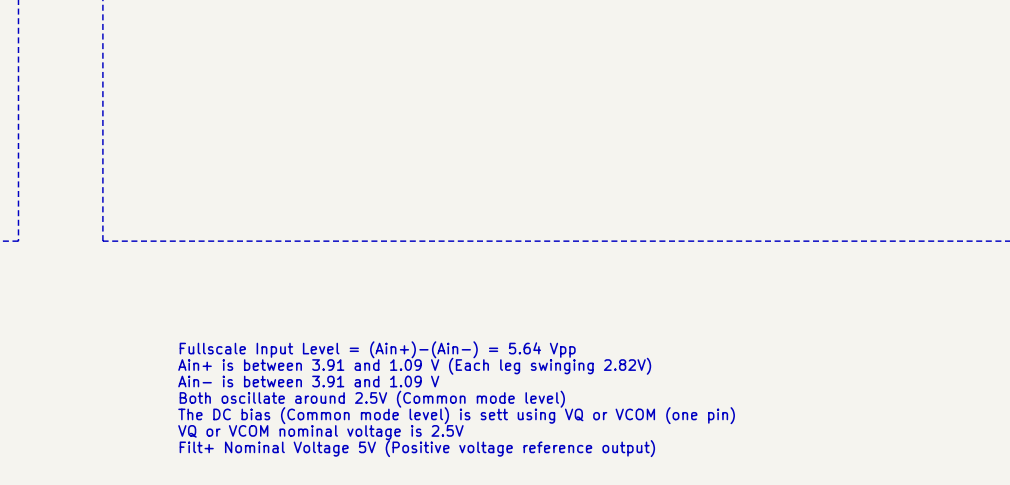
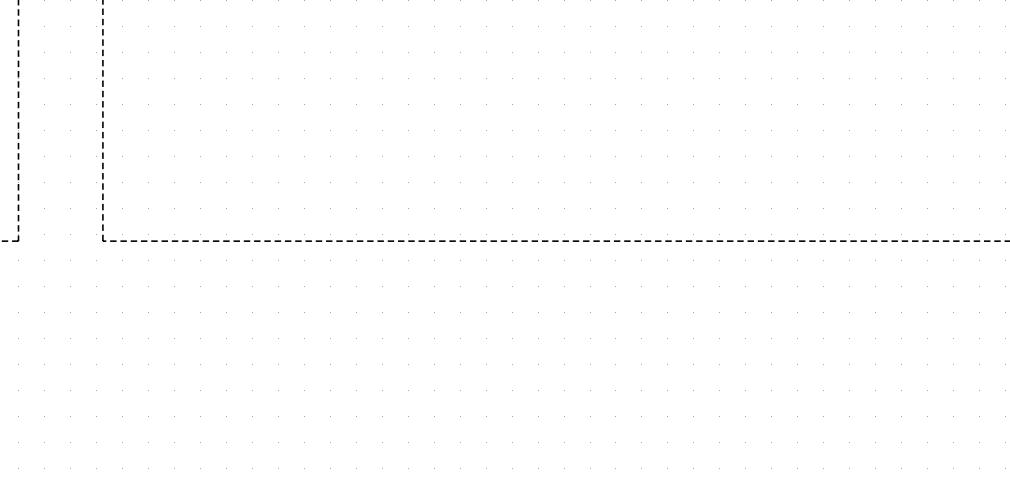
text: Fullscale Input Level = (Ain+)-(Ain-) = 5.64 Vpp (377, 349) -> none
text: Ain+ is between 3.91 and 1.09 V (Each leg swinging 2.82V) (414, 366) -> none
text: Ain- is between 3.91 and 1.09 V (308, 381) -> none
text: Both oscillate around 2.5V (Common mode level) (372, 399) -> none
text: The DC bias (Common mode level) is sett using VQ or VCOM (one pin) (456, 415) -> none
text: VQ or VCOM nominal voltage is 2.5V (320, 432) -> none
text: Filt+ Nominal Voltage 5V (Positive voltage reference output) (417, 448) -> none

